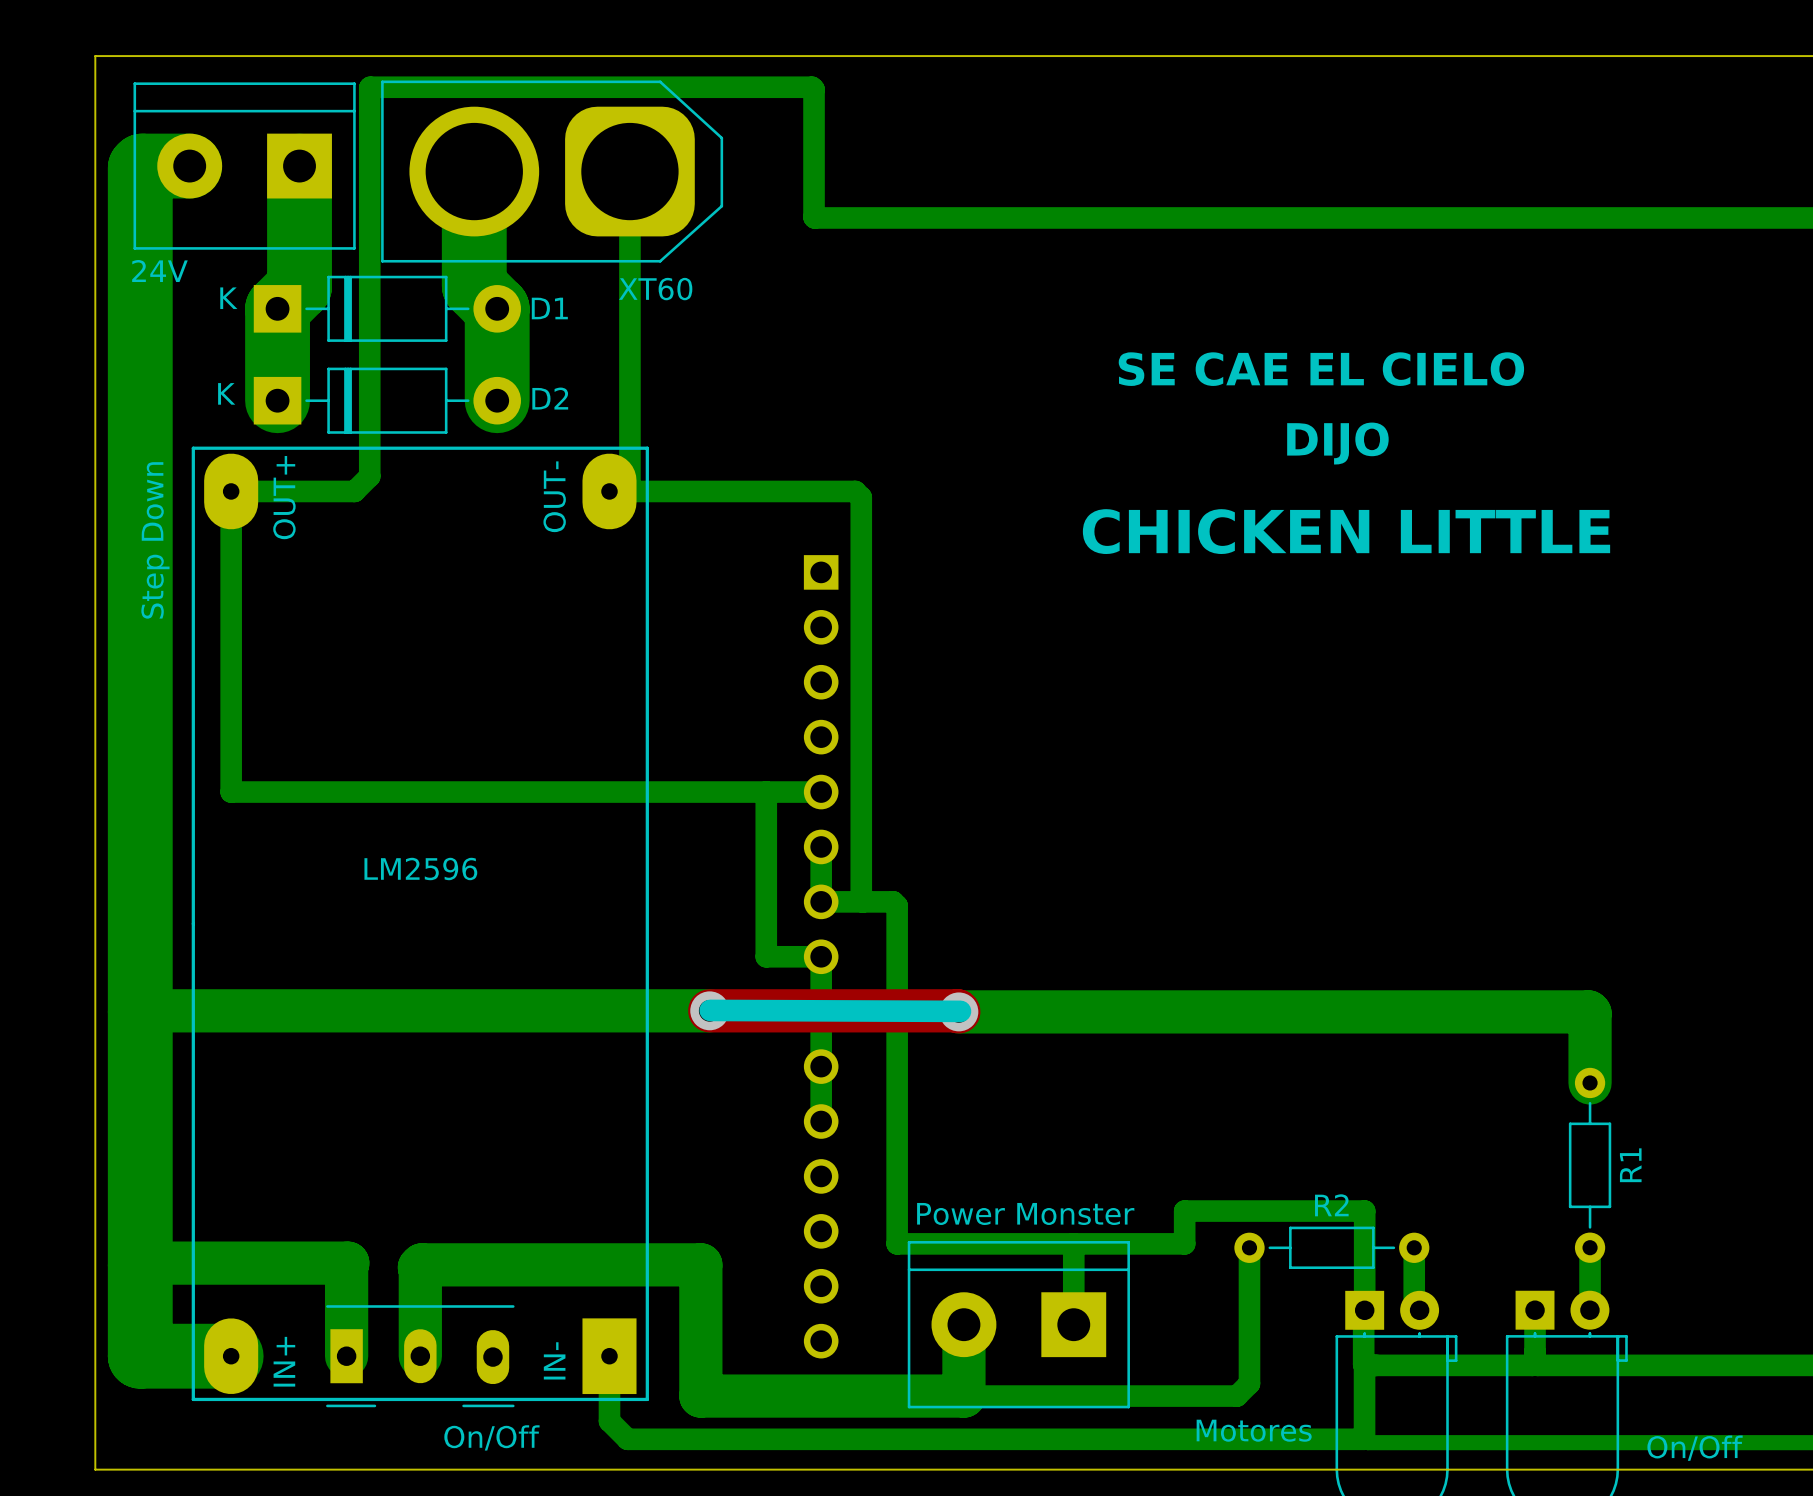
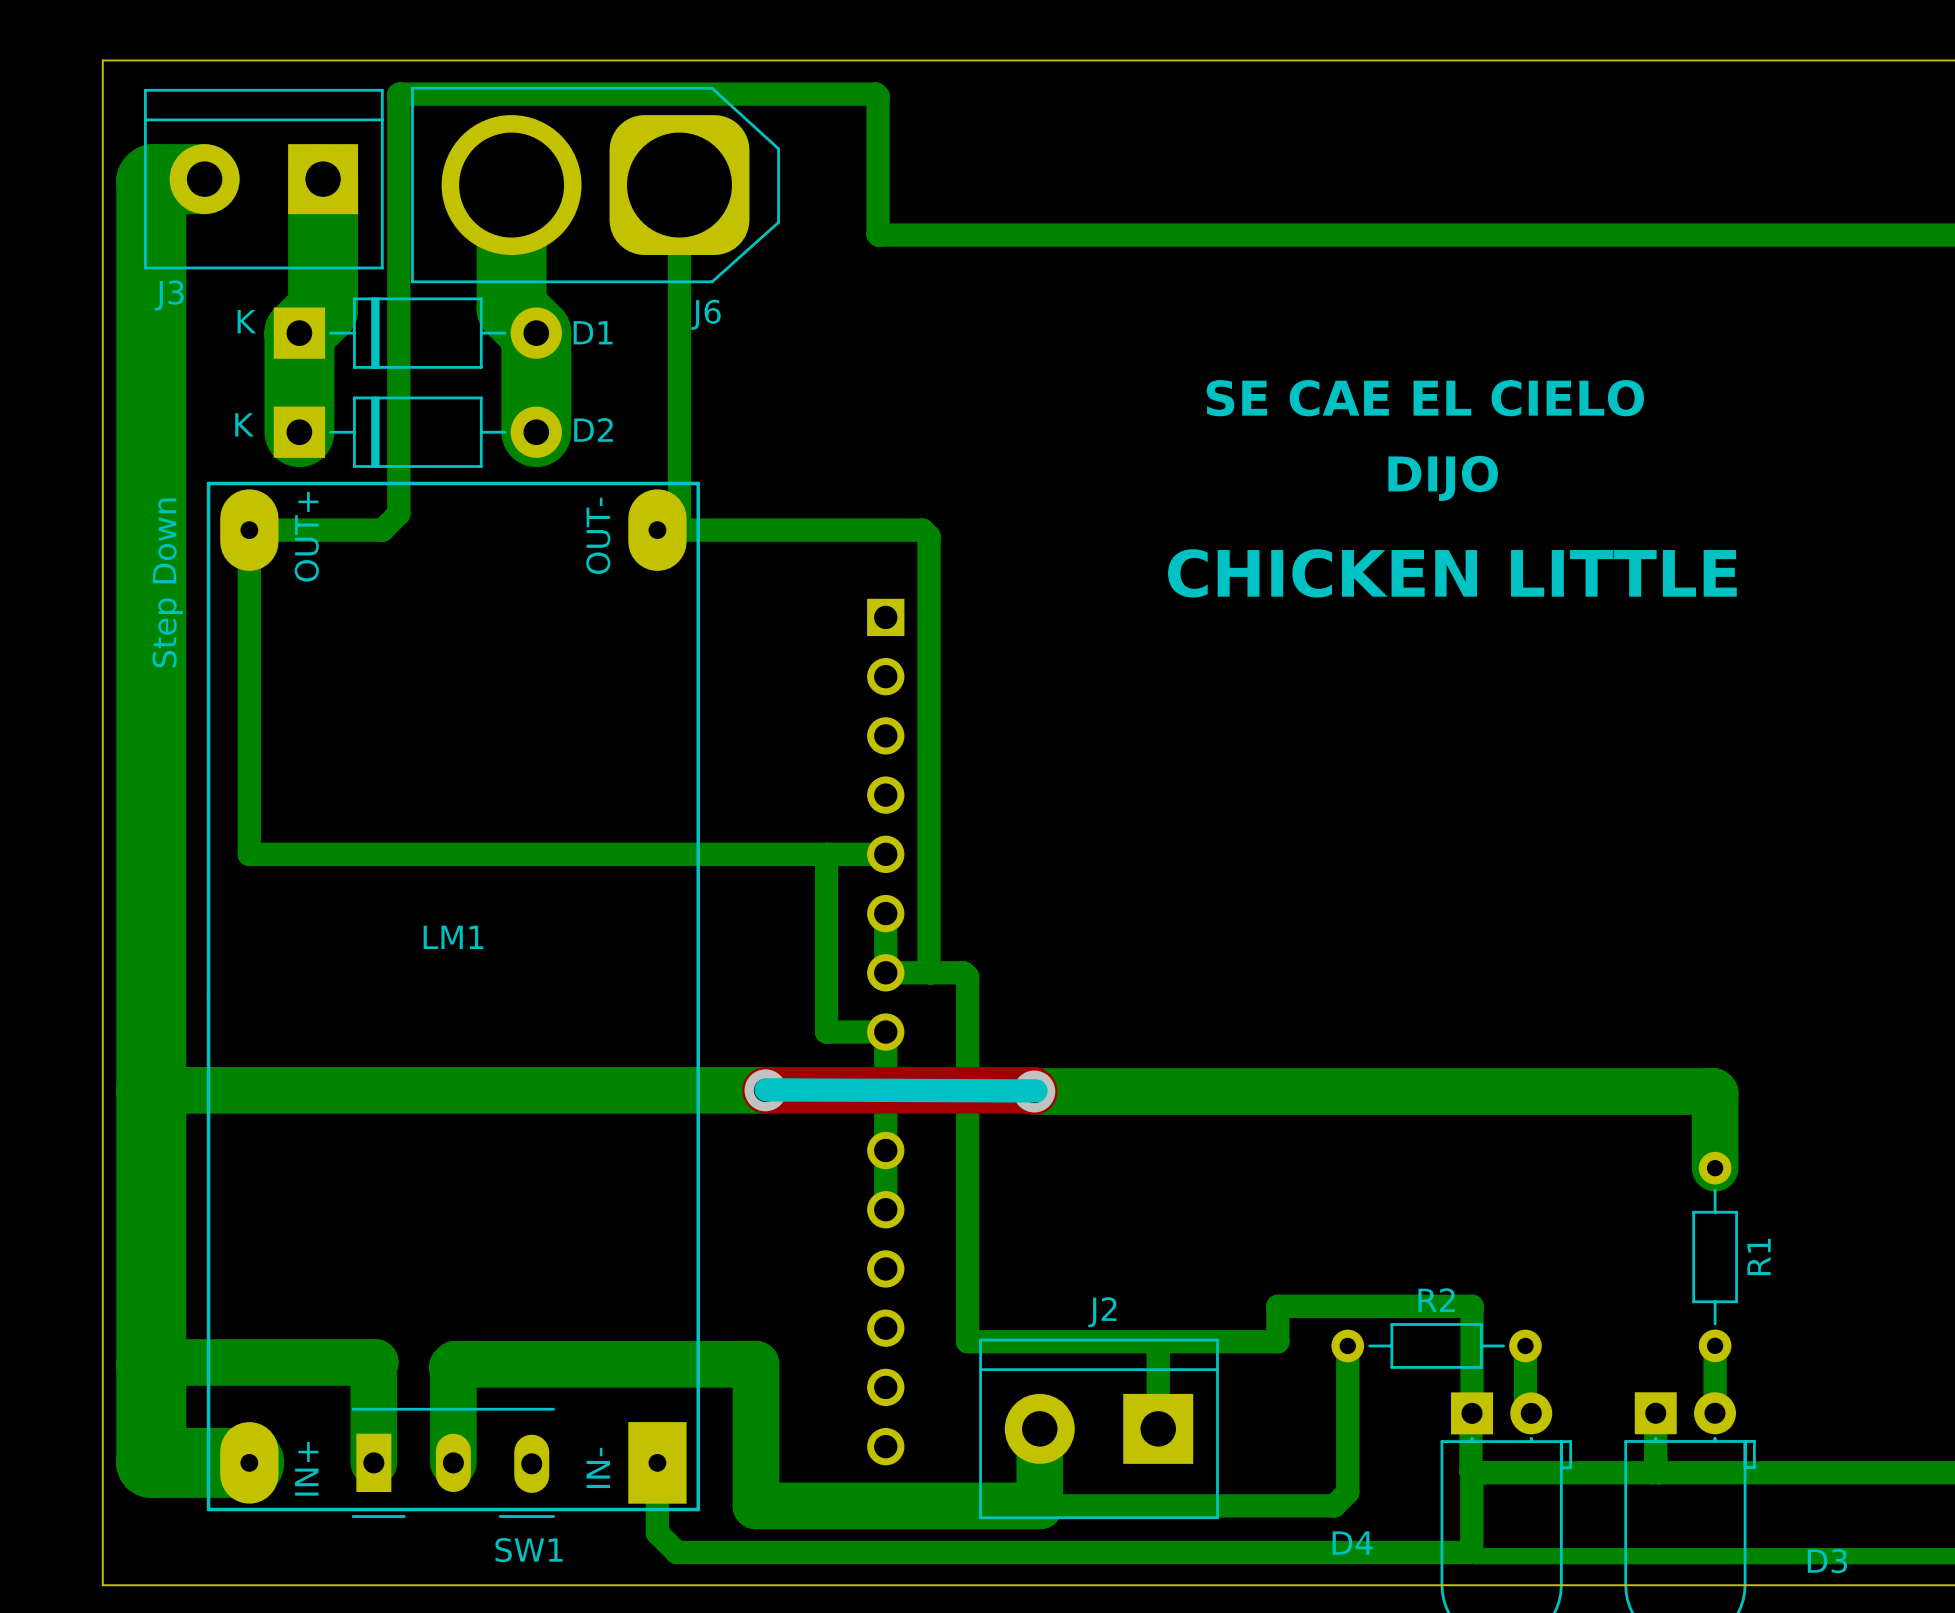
24V name: 24V (159, 271) -> J3 (169, 295)
XT60 name: XT60 (655, 289) -> J6 (705, 314)
LM2596 name: LM2596 (420, 868) -> LM1 (453, 937)
Power Monster name: Power Monster (1025, 1213) -> J2 (1102, 1312)
Motores name: Motores (1254, 1430) -> D4 (1352, 1543)
On/Off name: On/Off (491, 1437) -> SW1 (529, 1550)
On/Off name: On/Off (1695, 1448) -> D3 (1827, 1561)

